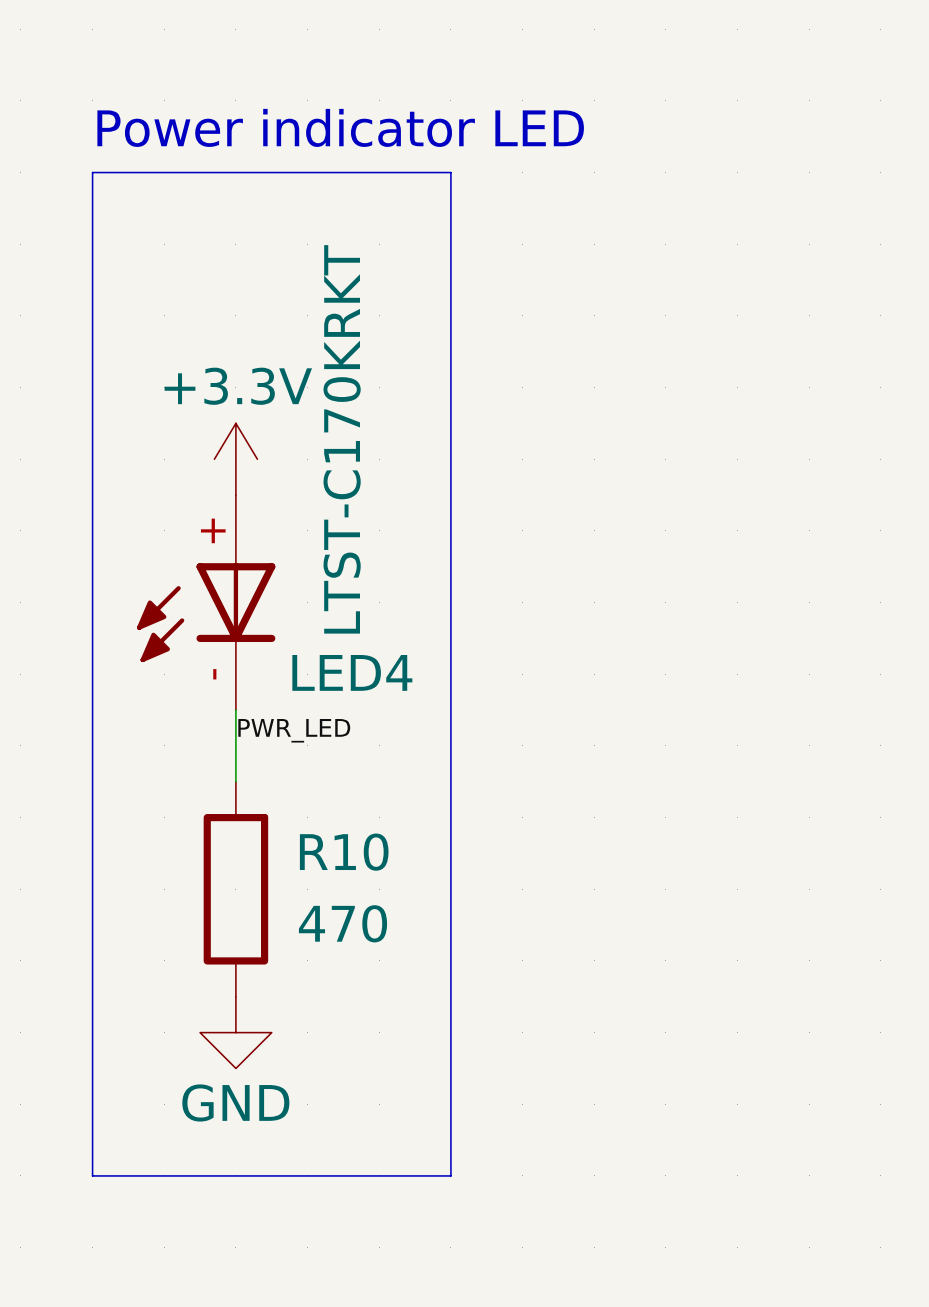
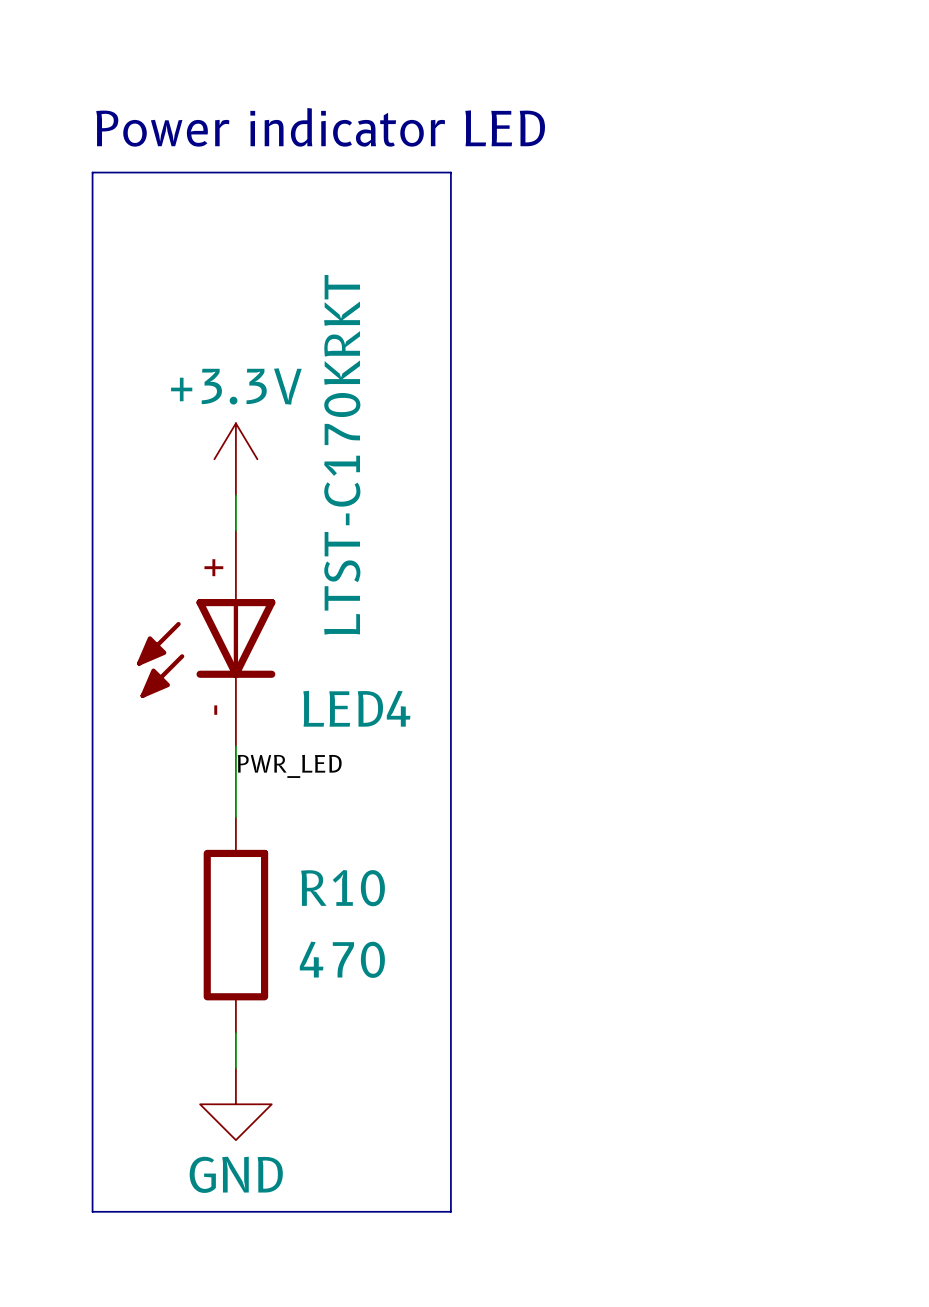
LED4 position: (206, 602) -> (206, 638)
label position: PWR_LED (294, 730) -> PWR_LED (289, 766)
R10 position: (235, 889) -> (235, 925)
wire: none -> (235, 1032) (235, 1068)
power symbol position: GND (235, 1032) -> GND (235, 1104)
line: (92, 1175) (450, 1175) -> (92, 1175) (92, 1211) (450, 1211) (450, 1175)

